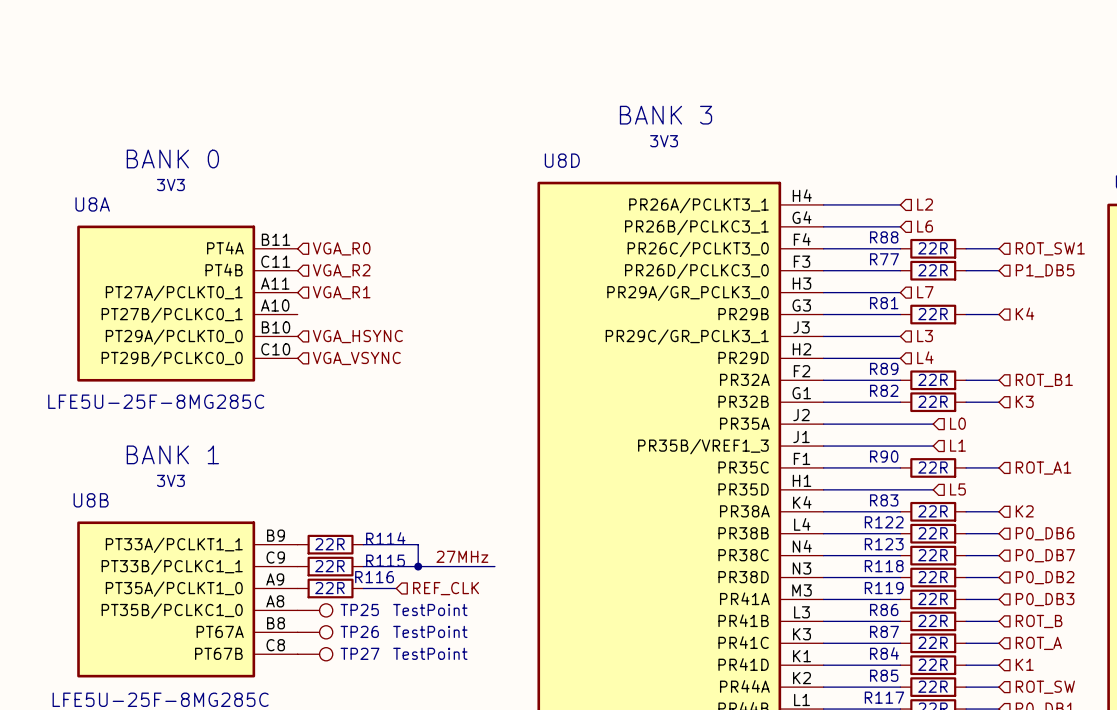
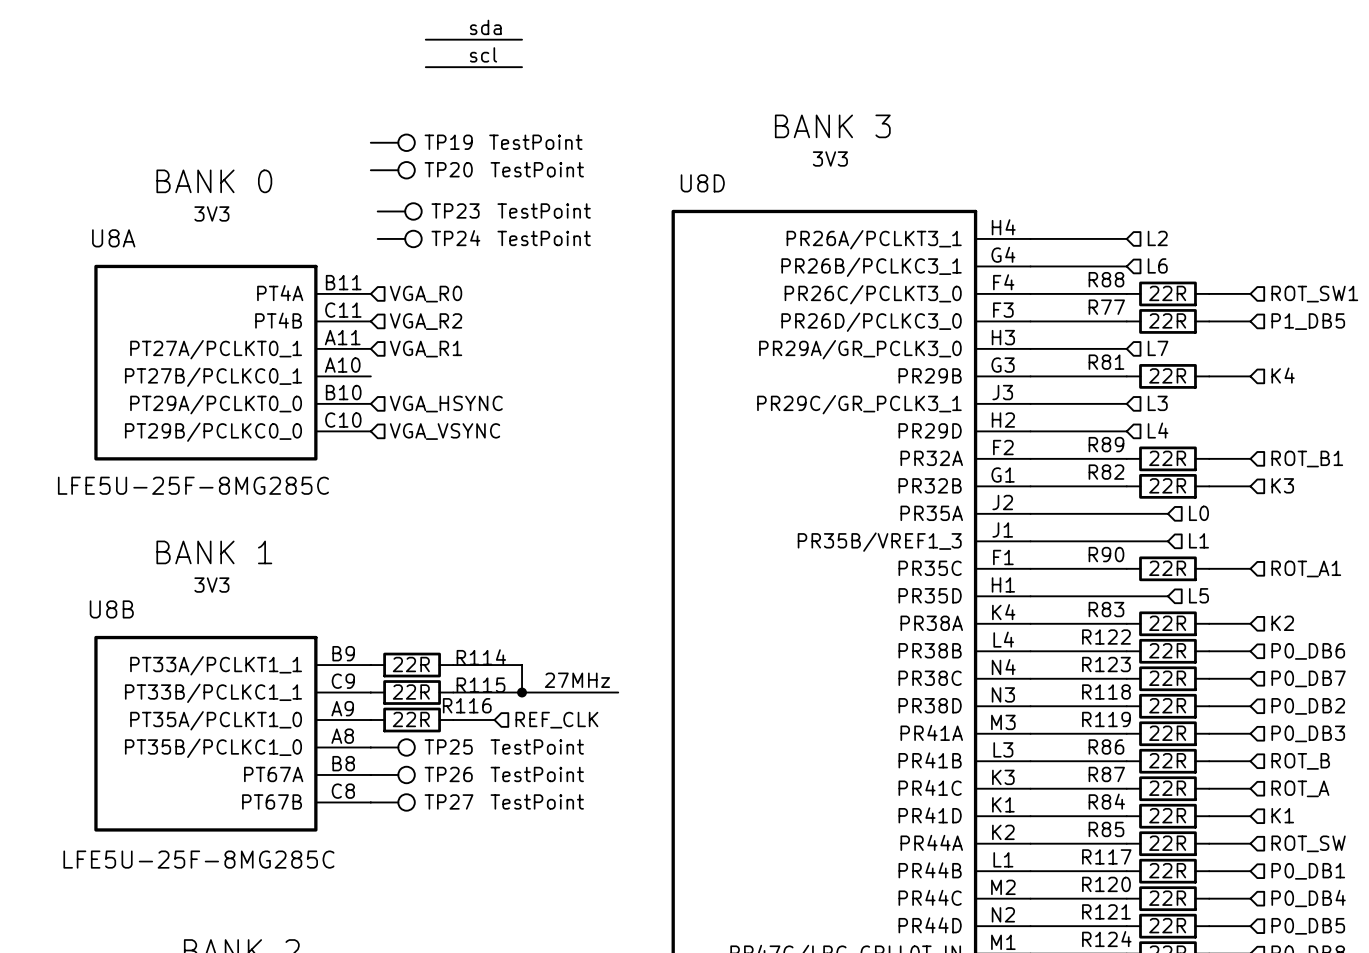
label: none -> sda (485, 27)
wire: none -> (425, 39) (522, 39)
label: none -> scl (483, 54)
wire: none -> (425, 67) (522, 67)
TP19: none -> TestPoint (392, 142)
TP20: none -> TestPoint (392, 170)
TP23: none -> TestPoint (399, 211)
TP24: none -> TestPoint (399, 238)

